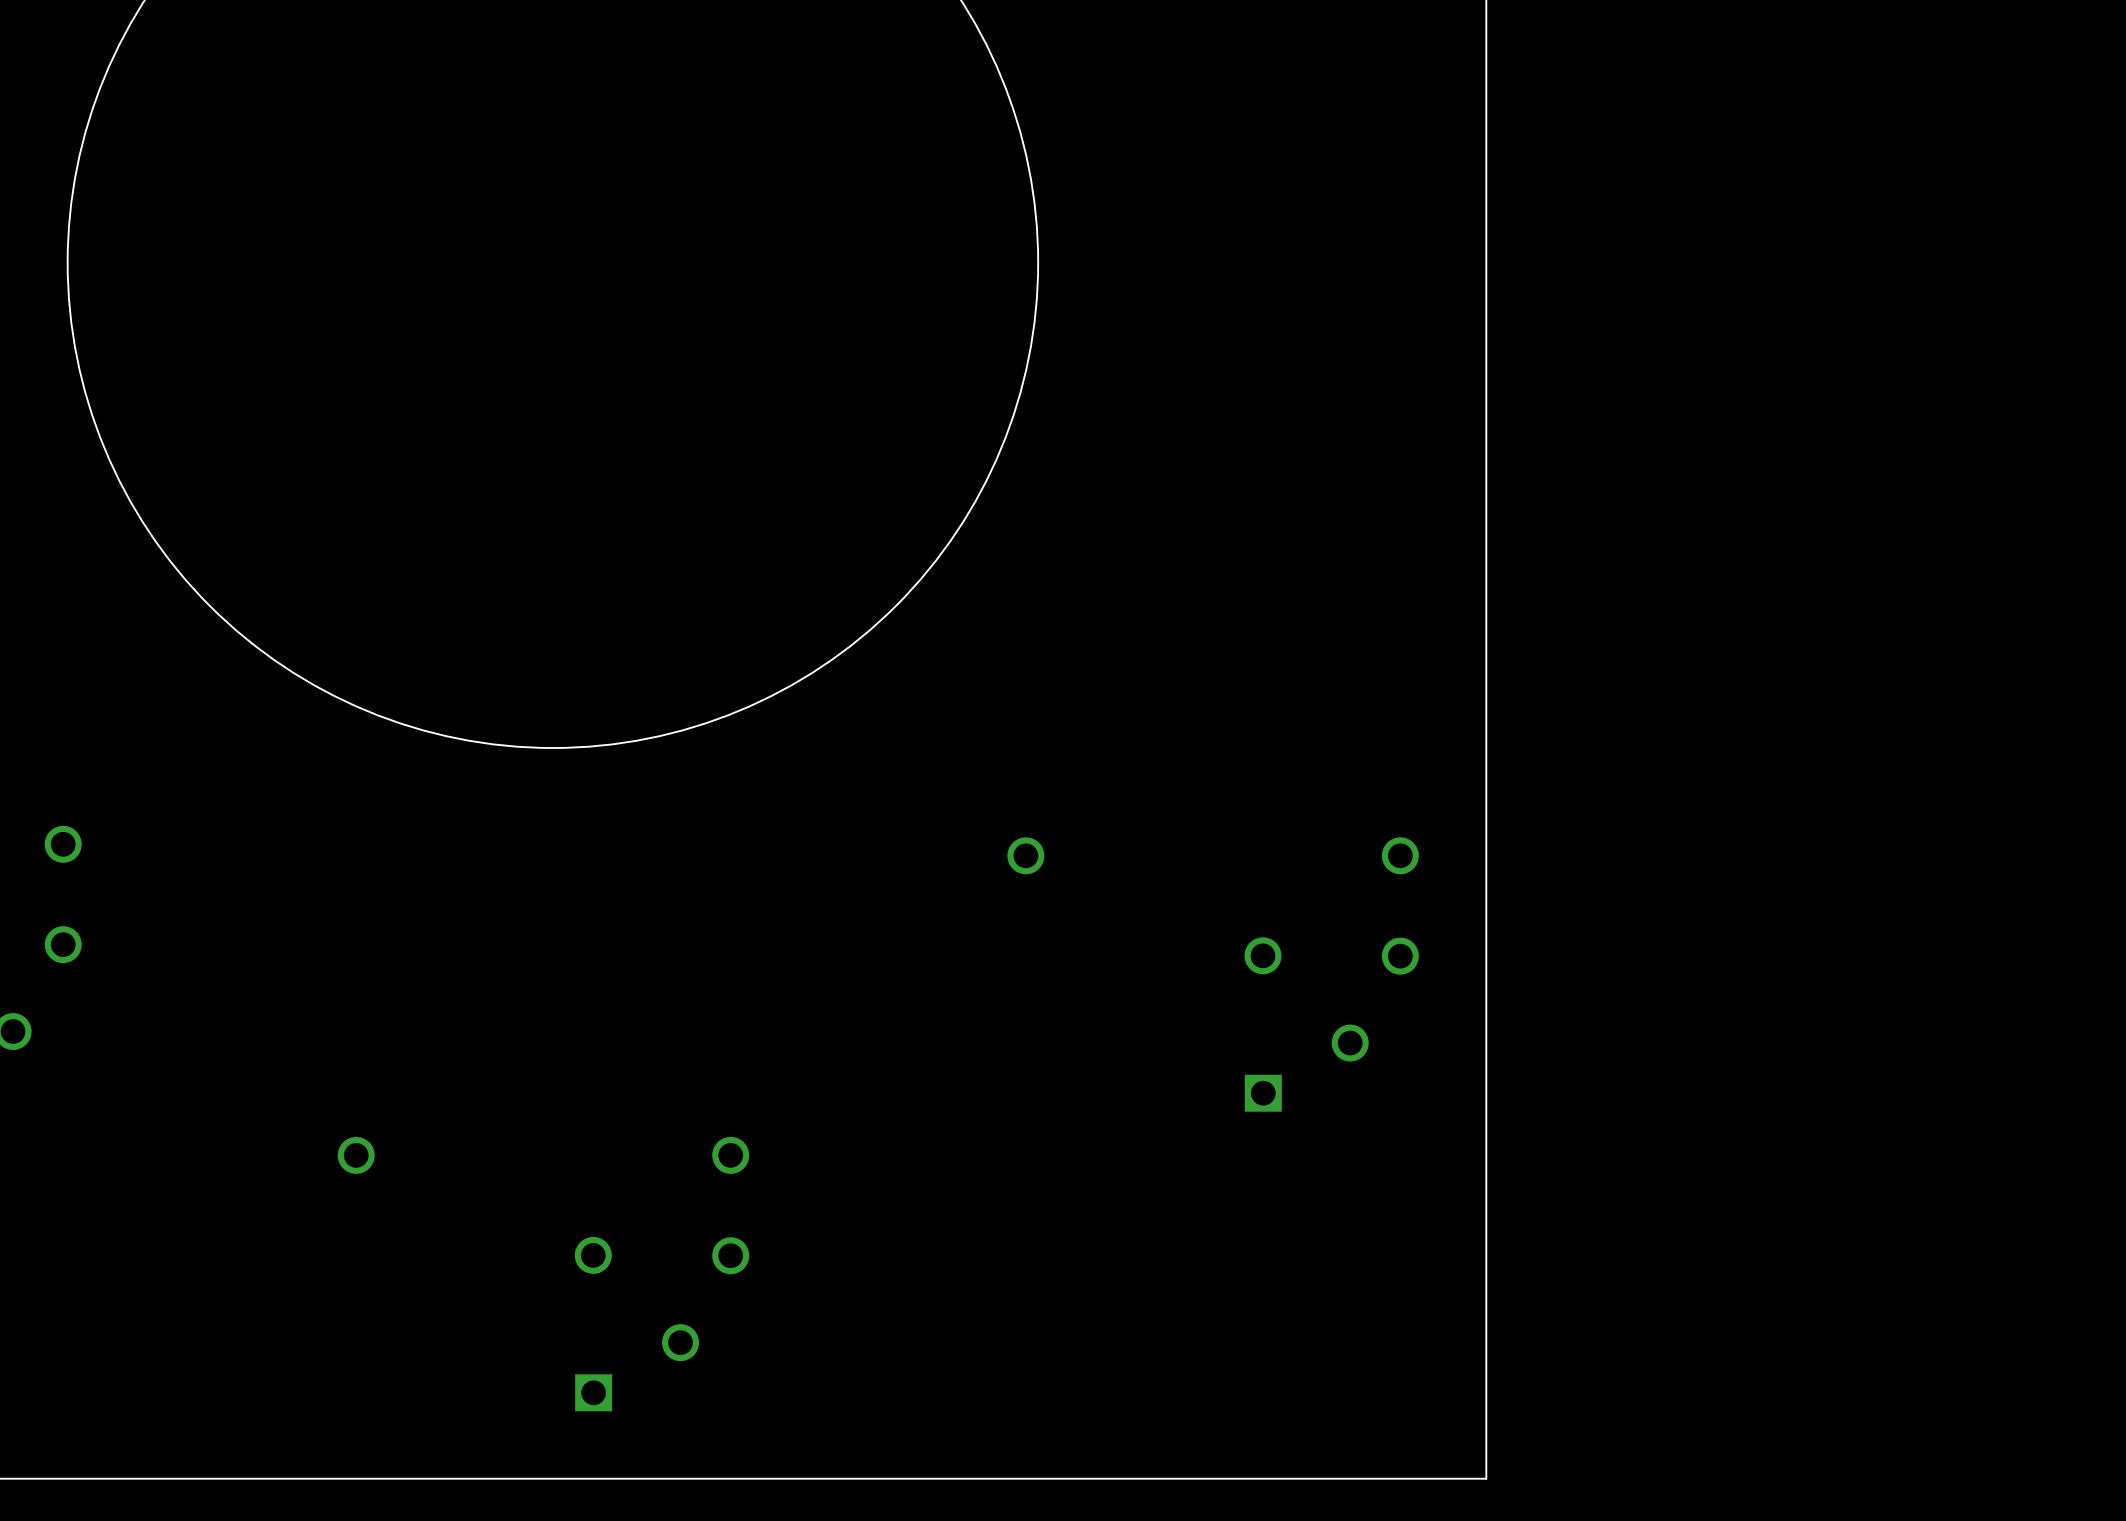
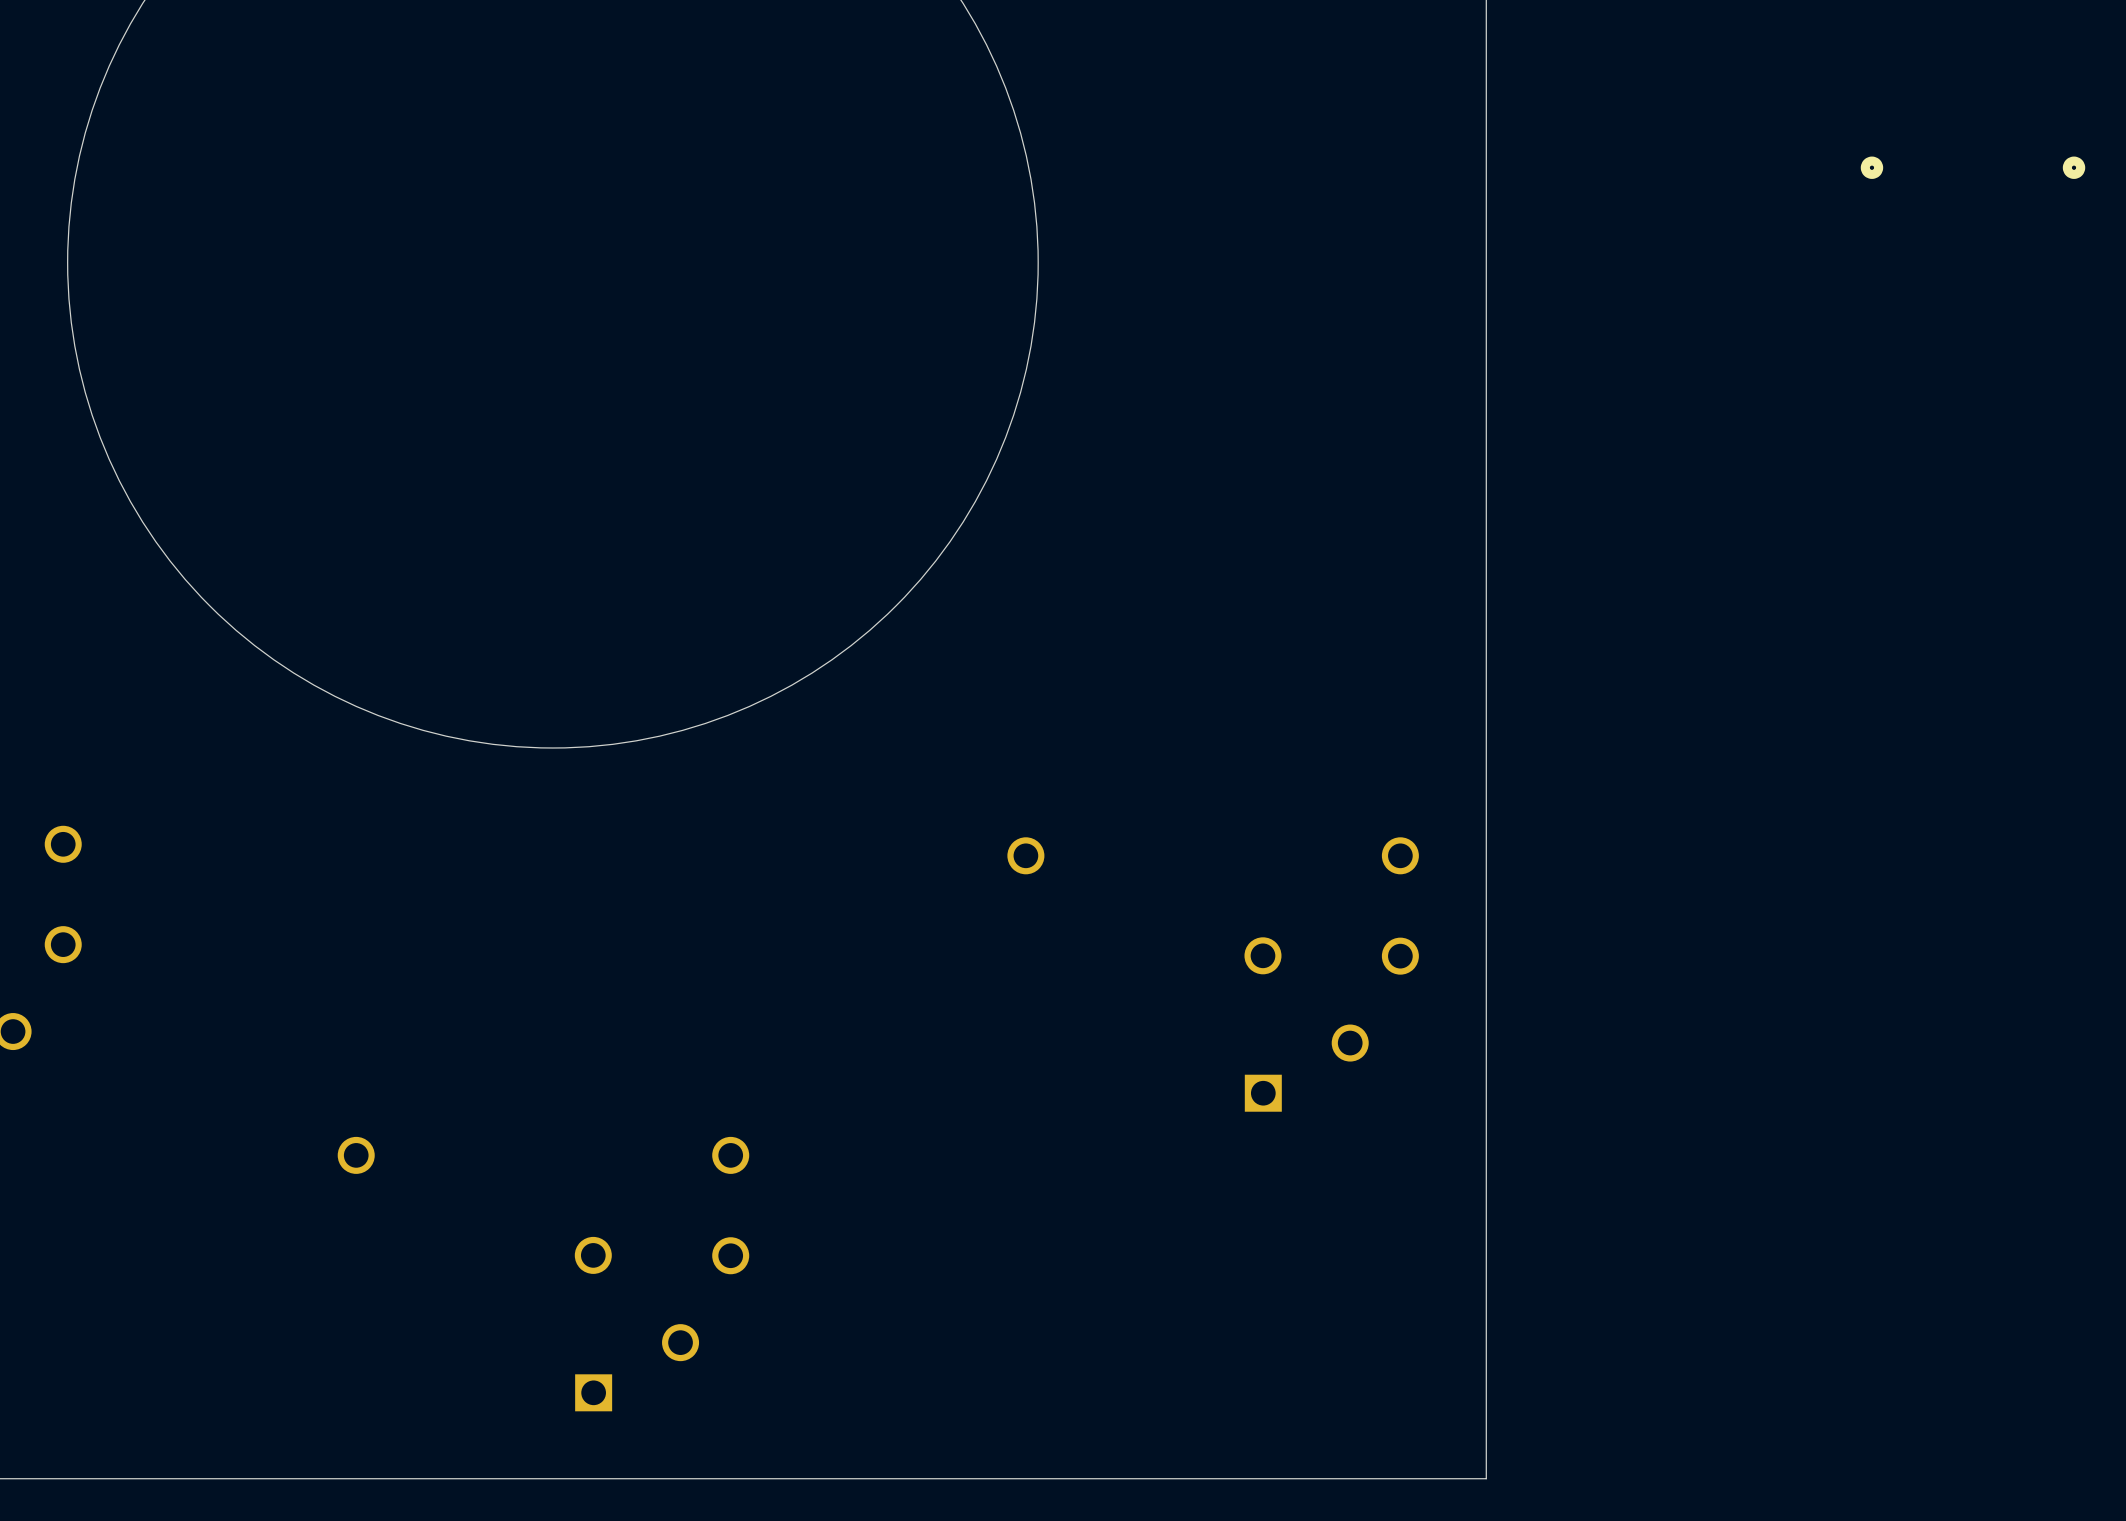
part: none -> (1871, 167)
part: none -> (2074, 167)

